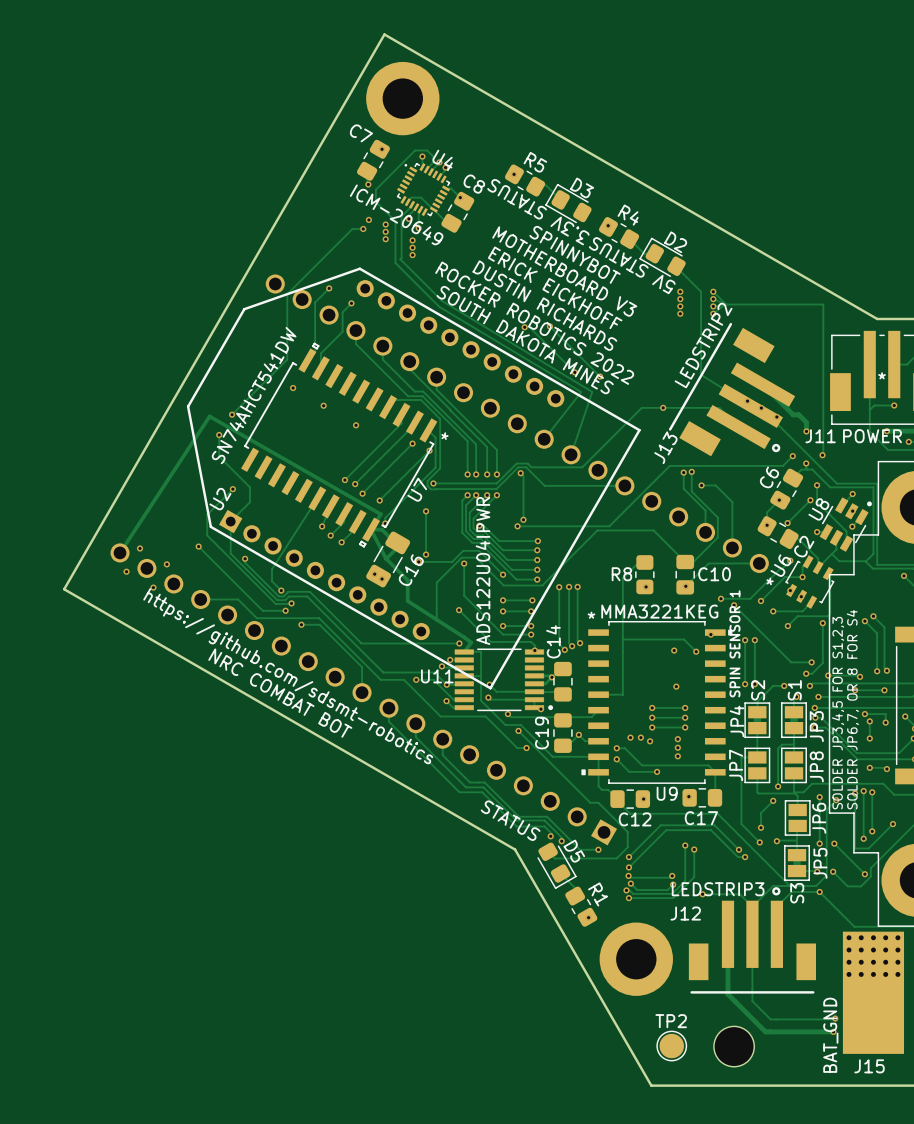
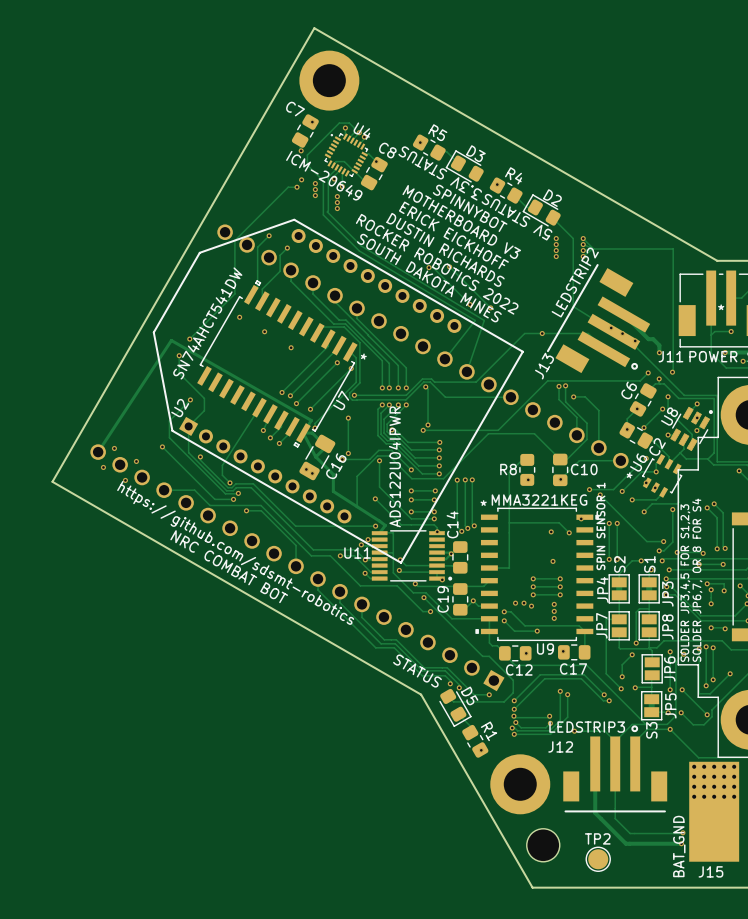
TP2 position: (671, 1046) -> (598, 859)
part position: (734, 1046) -> (543, 845)

